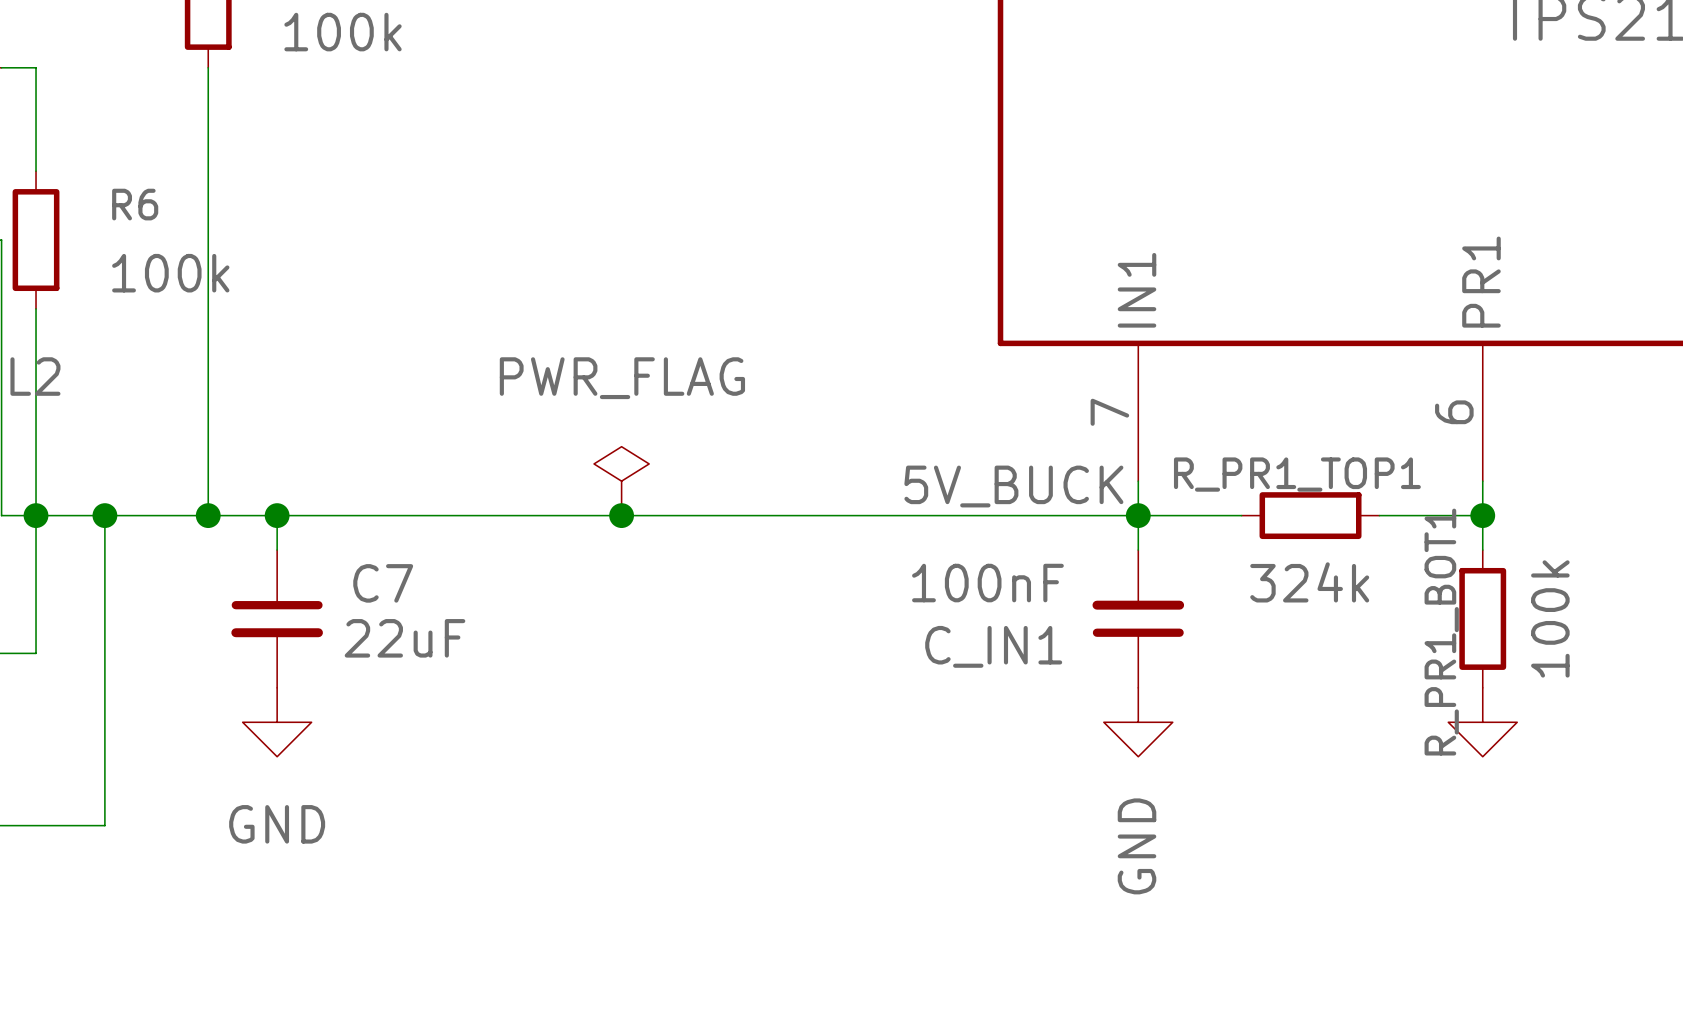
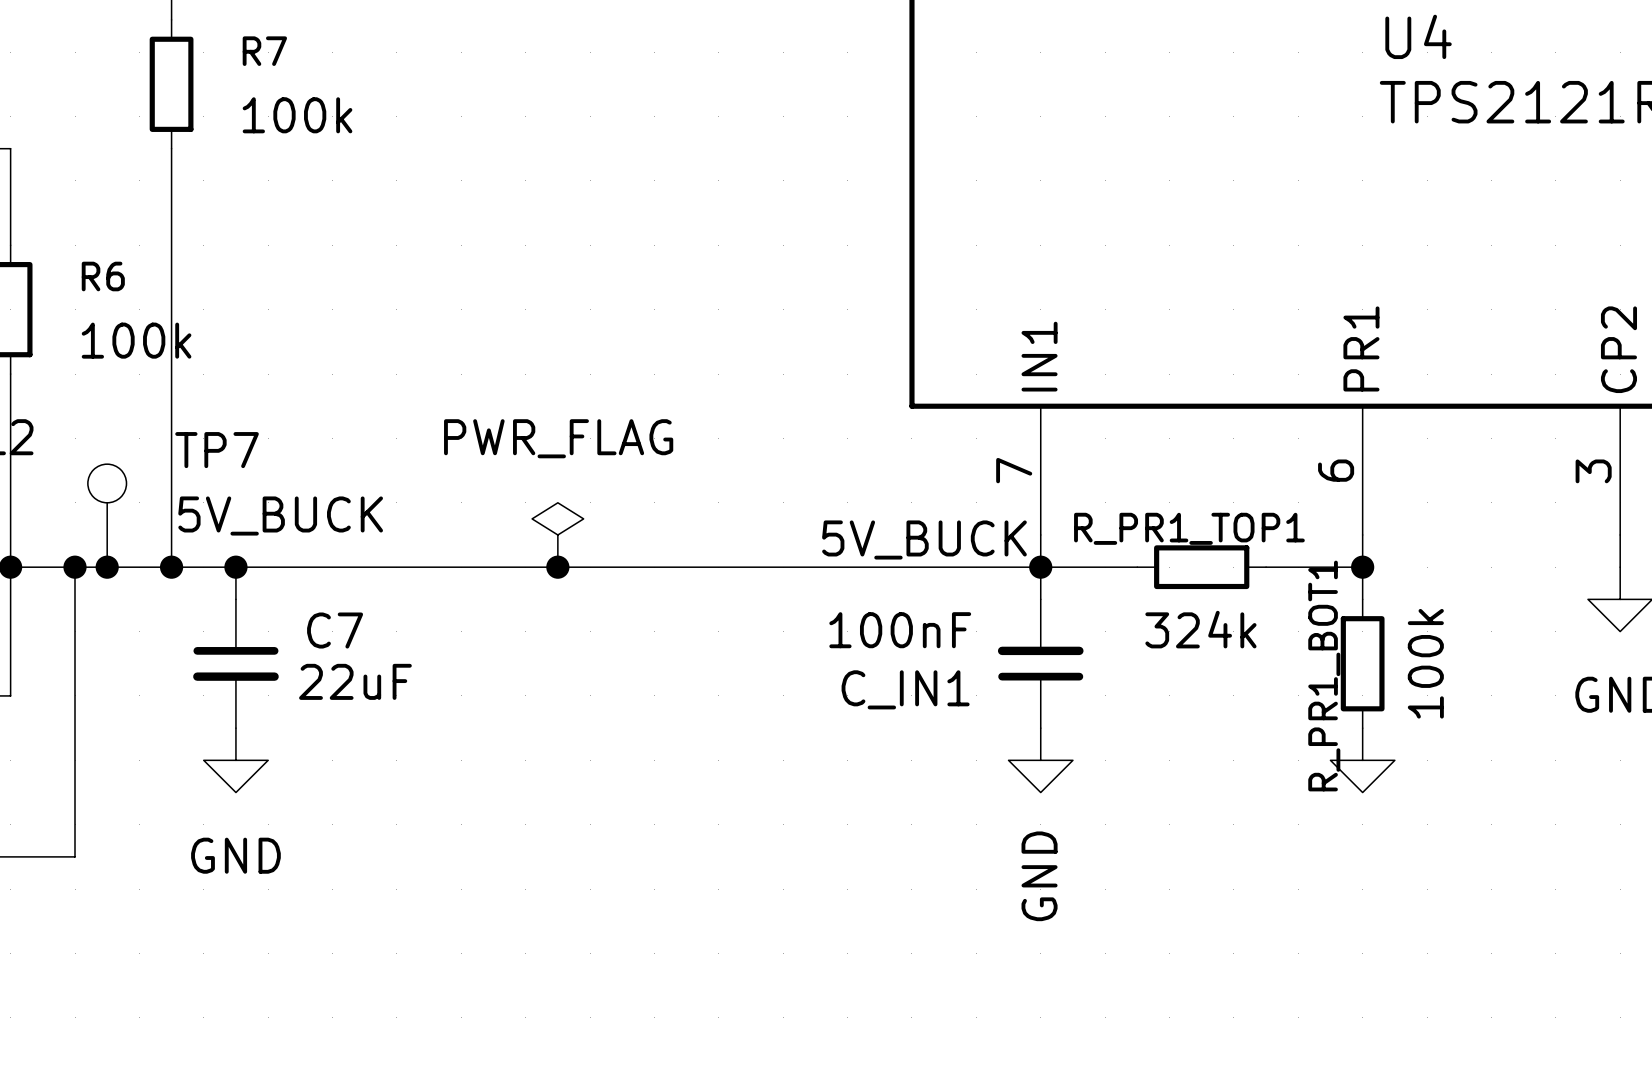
TP7: none -> 5V_BUCK (107, 515)
junction: none -> (107, 567)

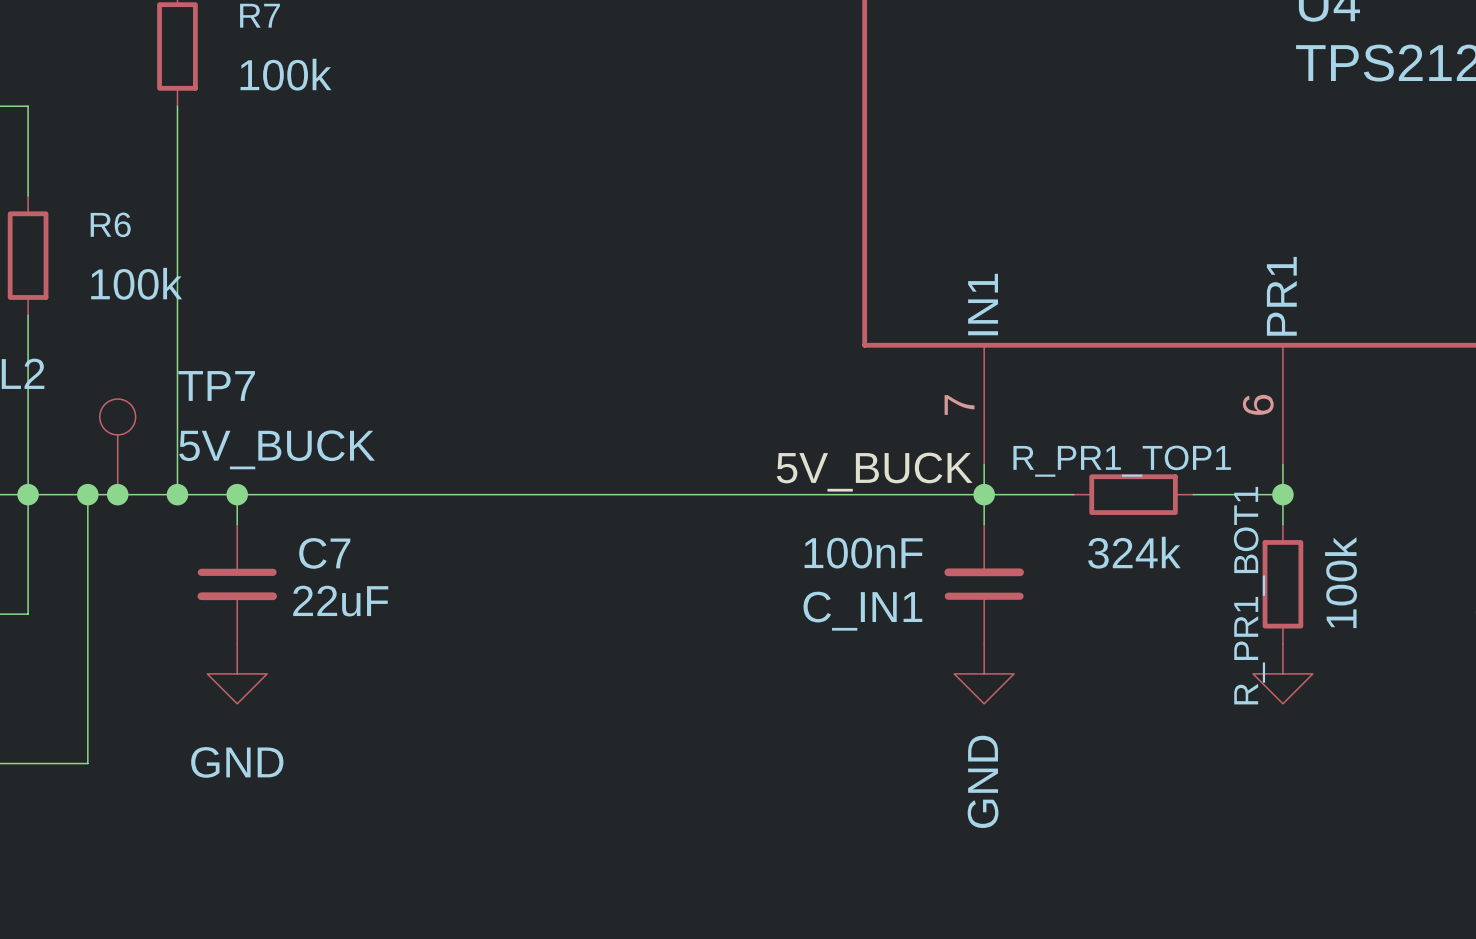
power symbol: PWR_FLAG (557, 534) -> none
junction: (557, 567) -> none

